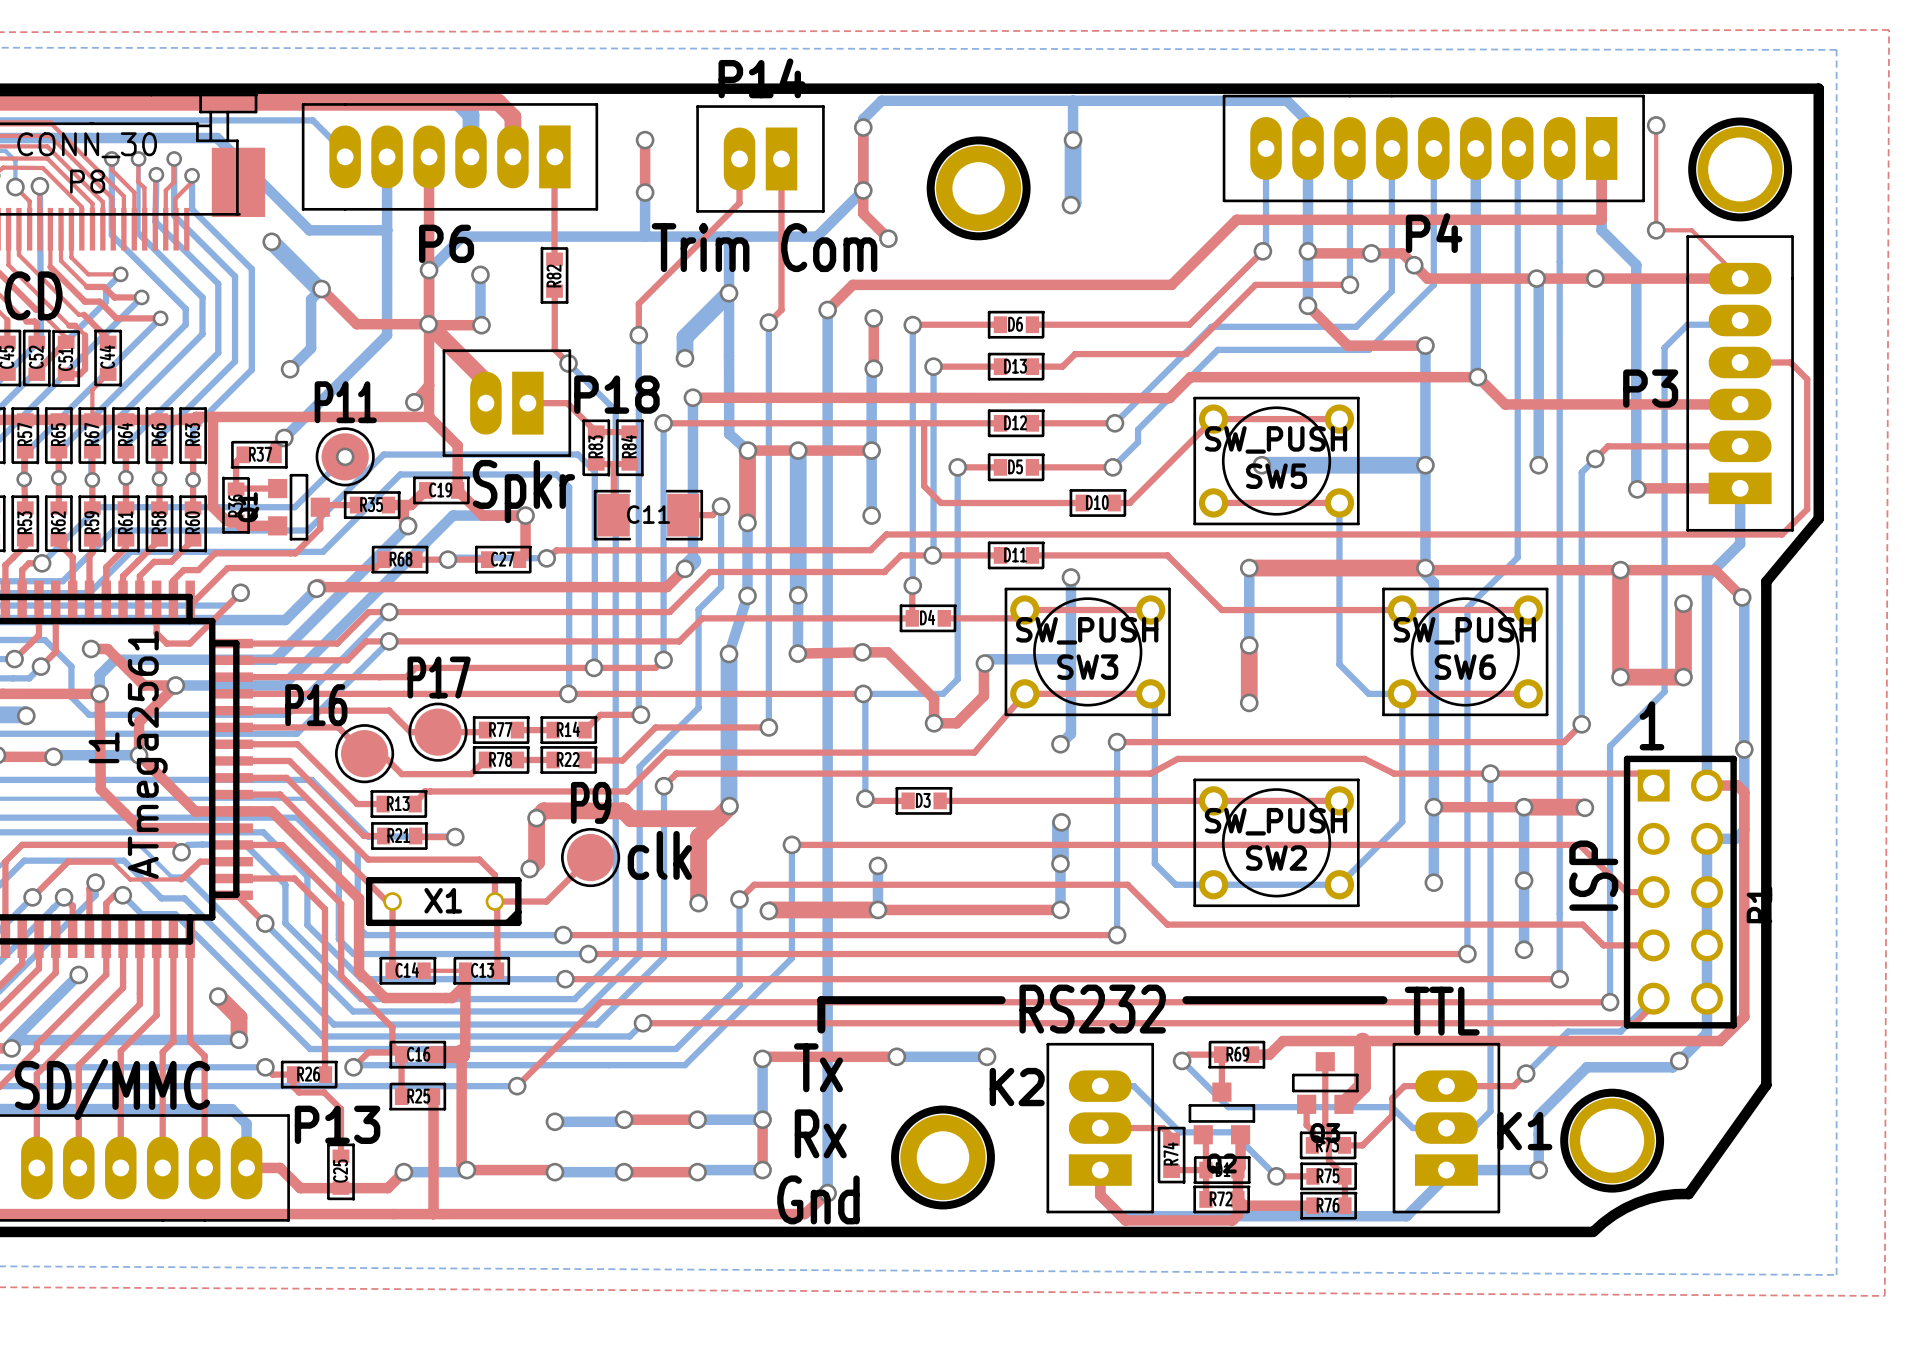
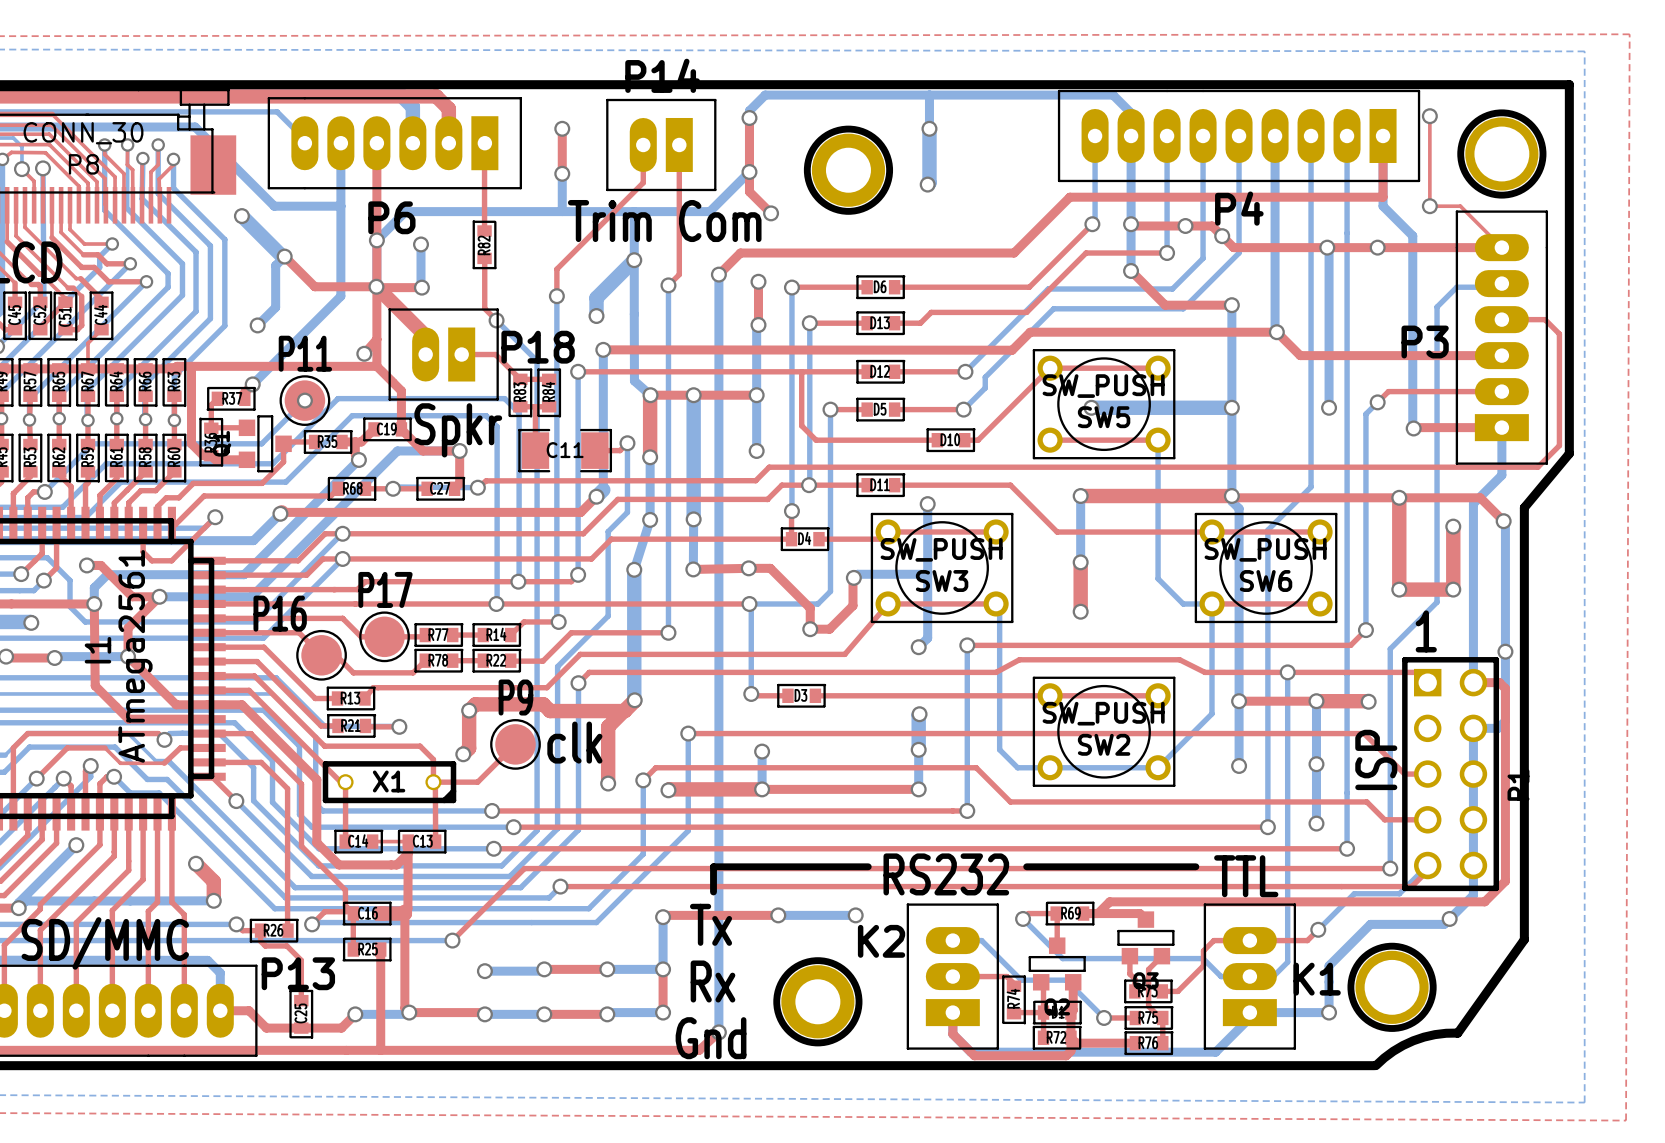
top track: (1362, 1041) (1362, 1086) (1343, 1104) -> none
top track: none -> (1097, 913) (1139, 913) (1145, 919)
top track: (1325, 1061) (1325, 1124) (1328, 1128) (1328, 1160) (1344, 1176) -> (1161, 956) (1148, 969) (1148, 1006) (1160, 1017) (1162, 1017)

